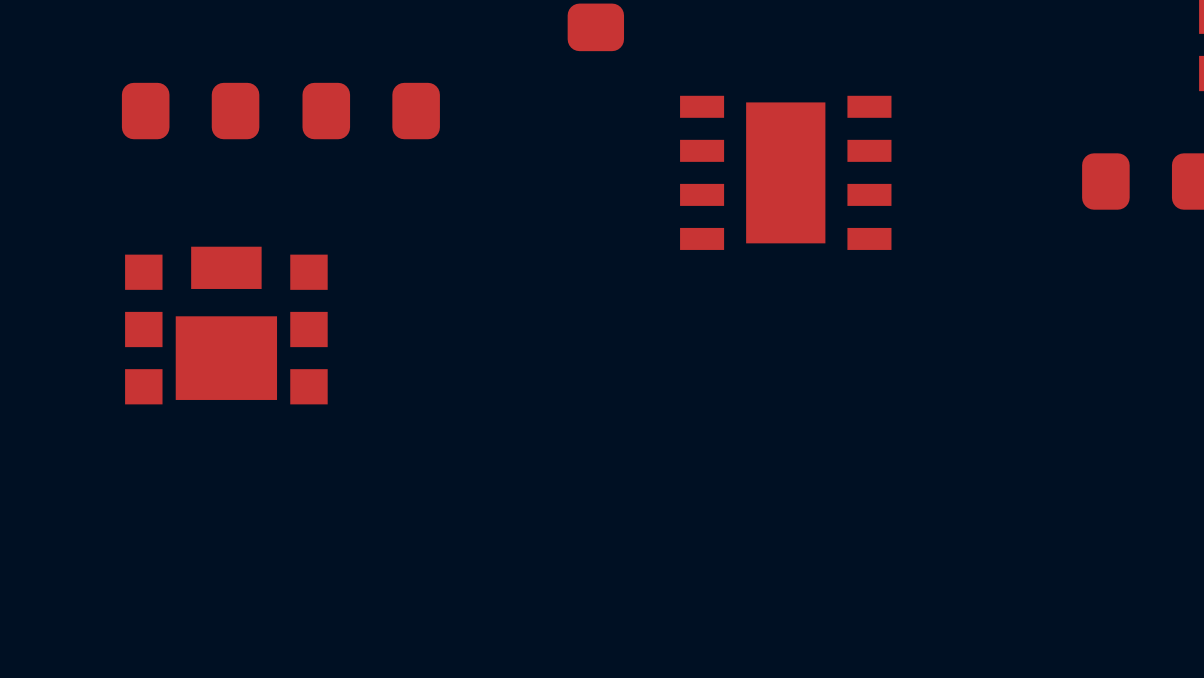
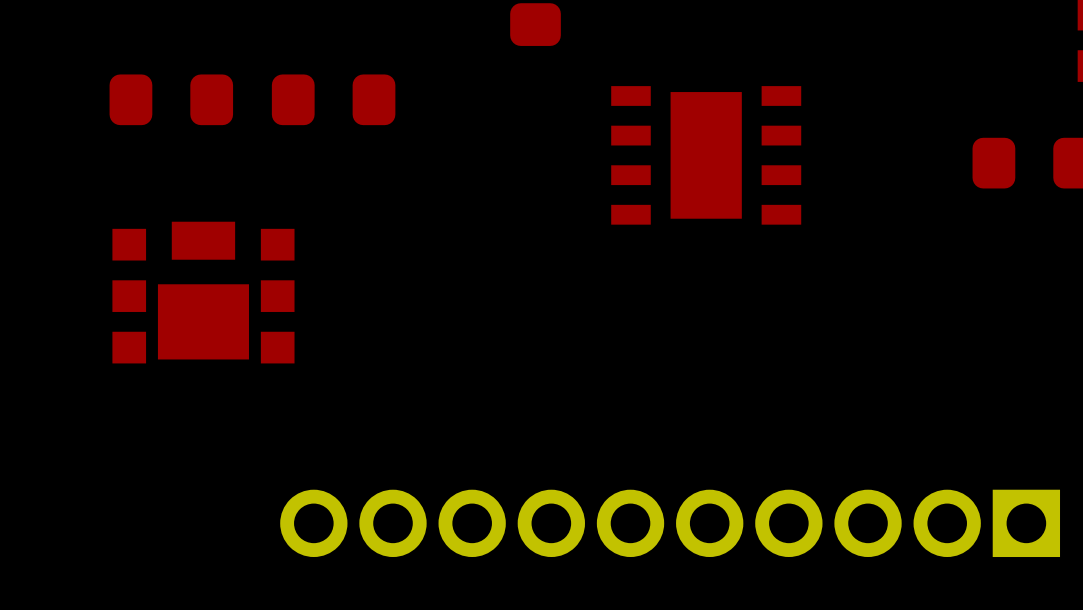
part: none -> (670, 523)

